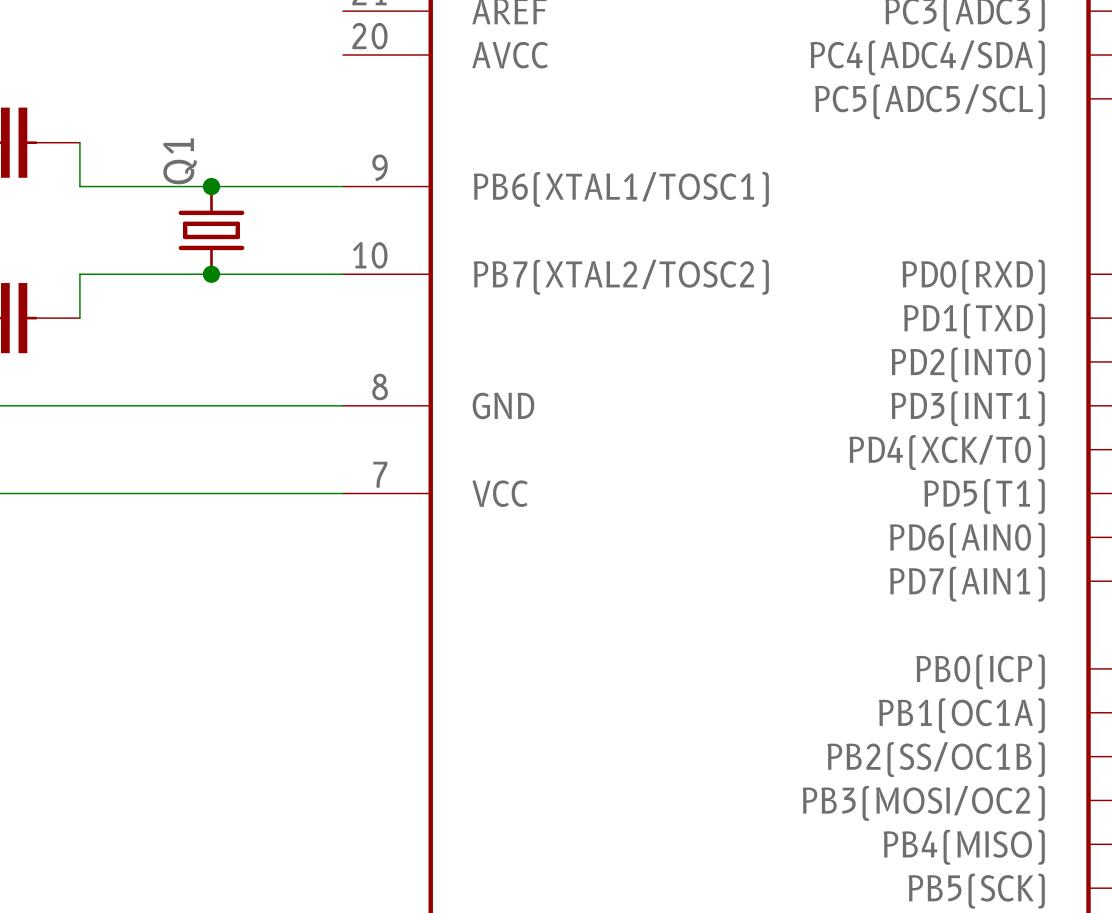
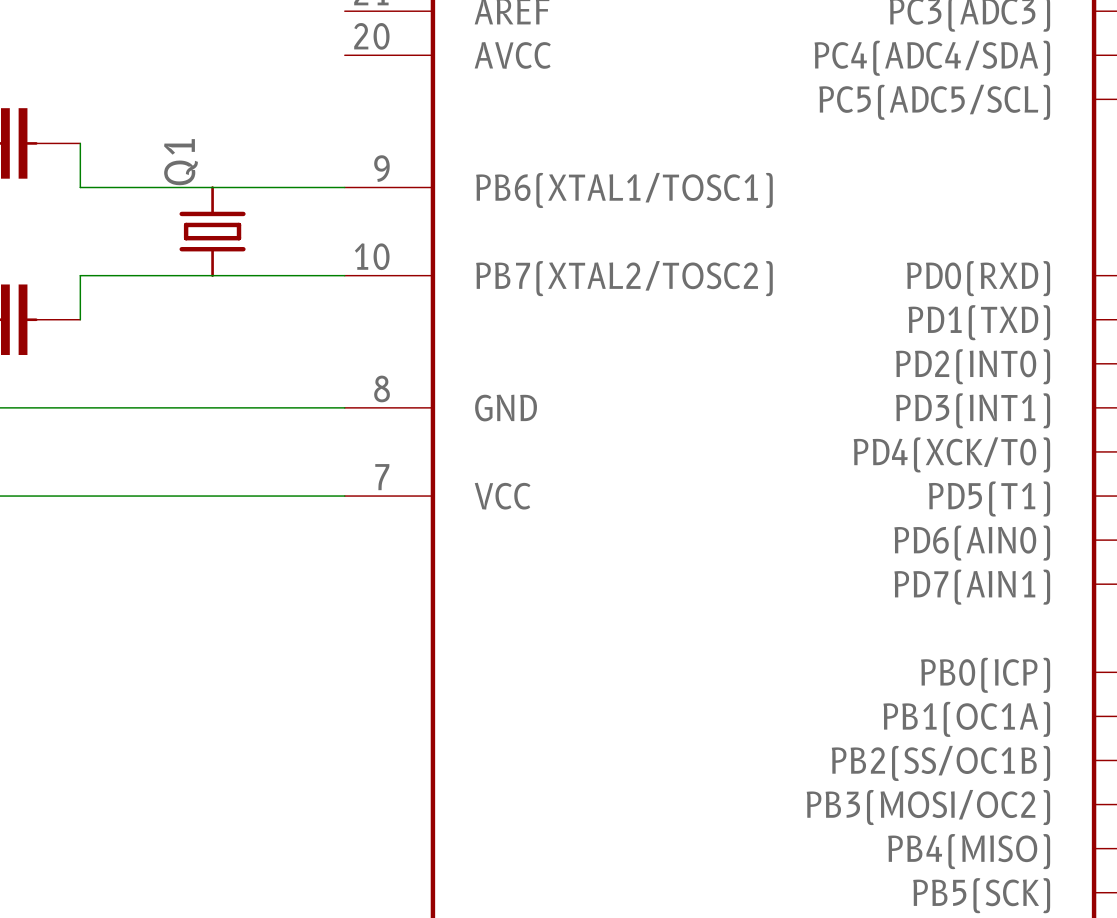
junction: (211, 186) -> none
junction: (211, 274) -> none

